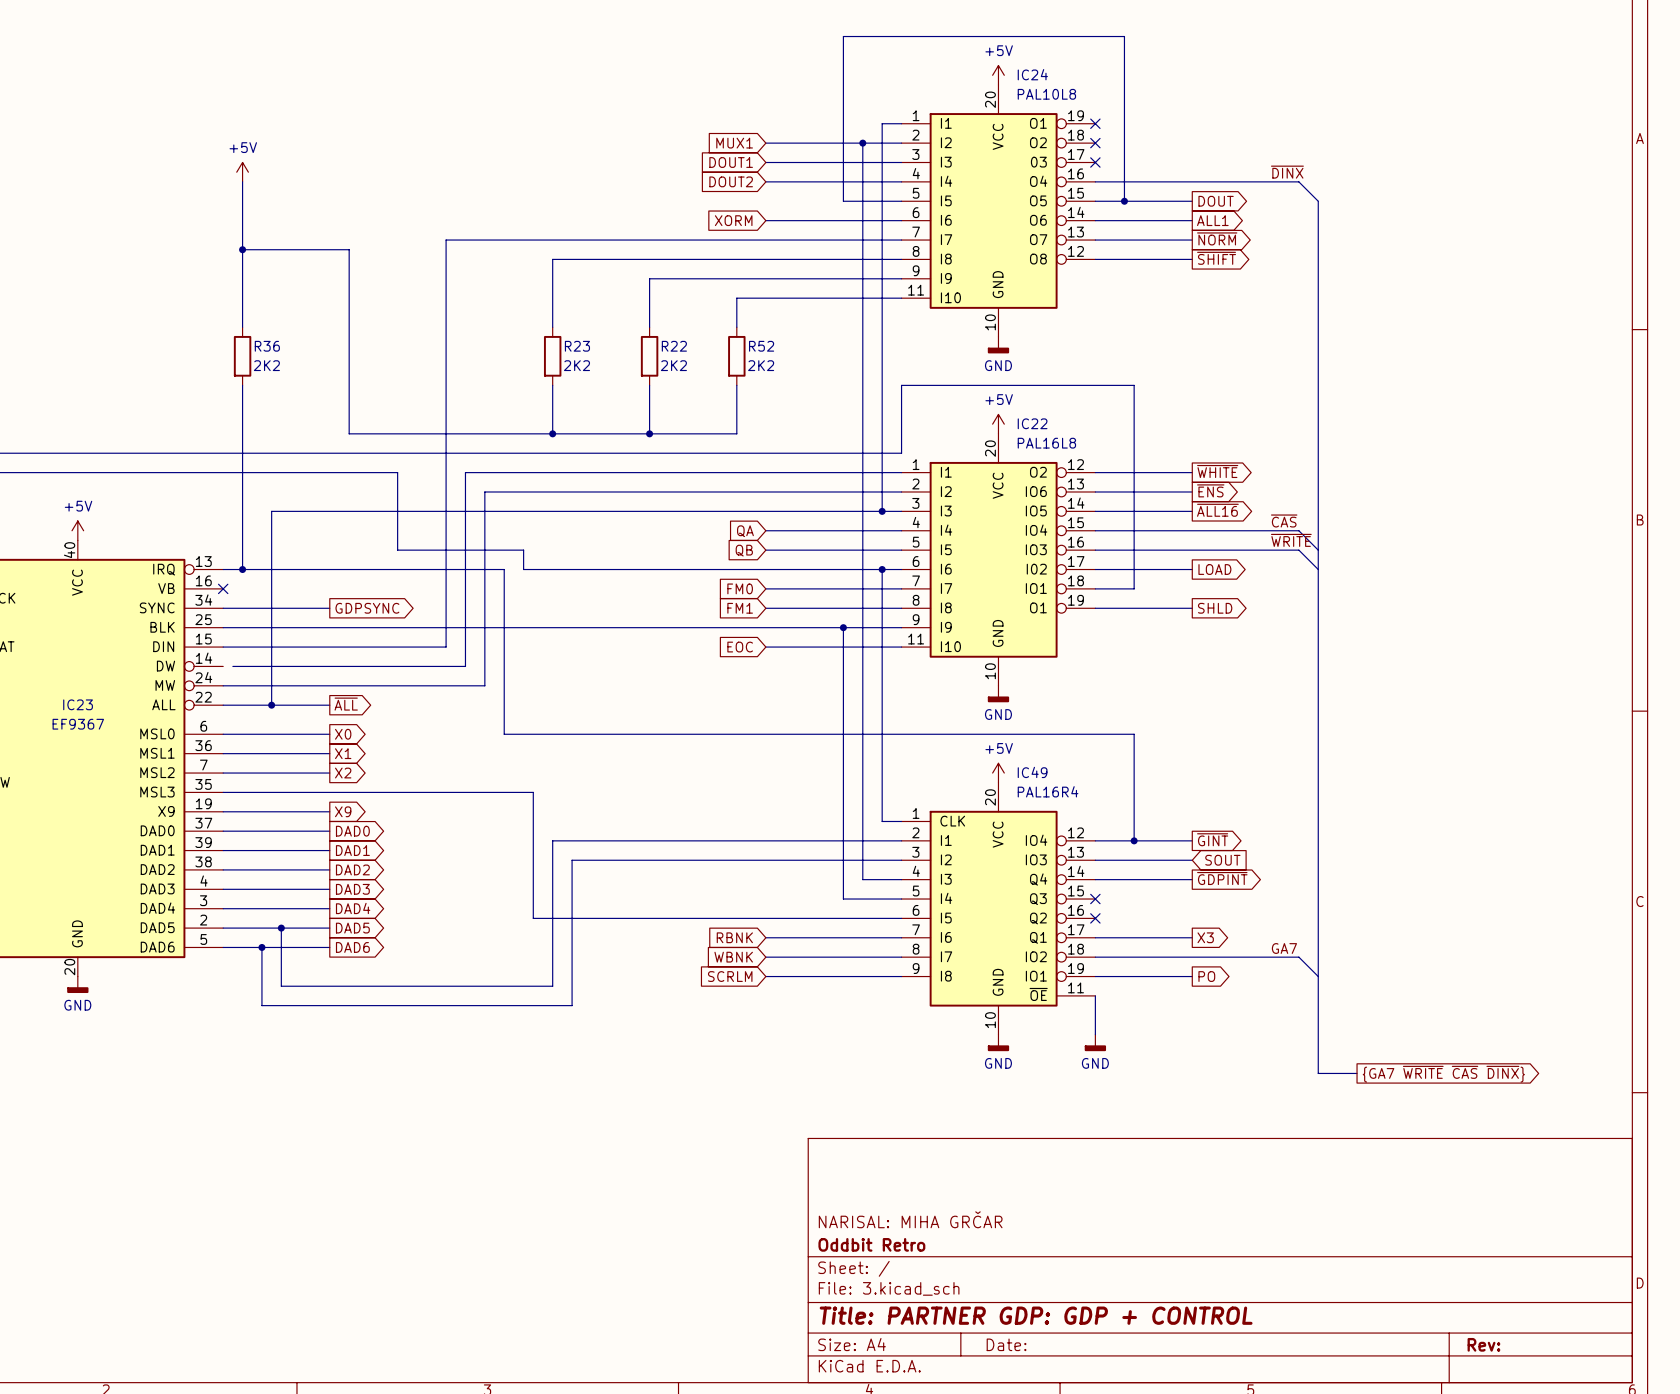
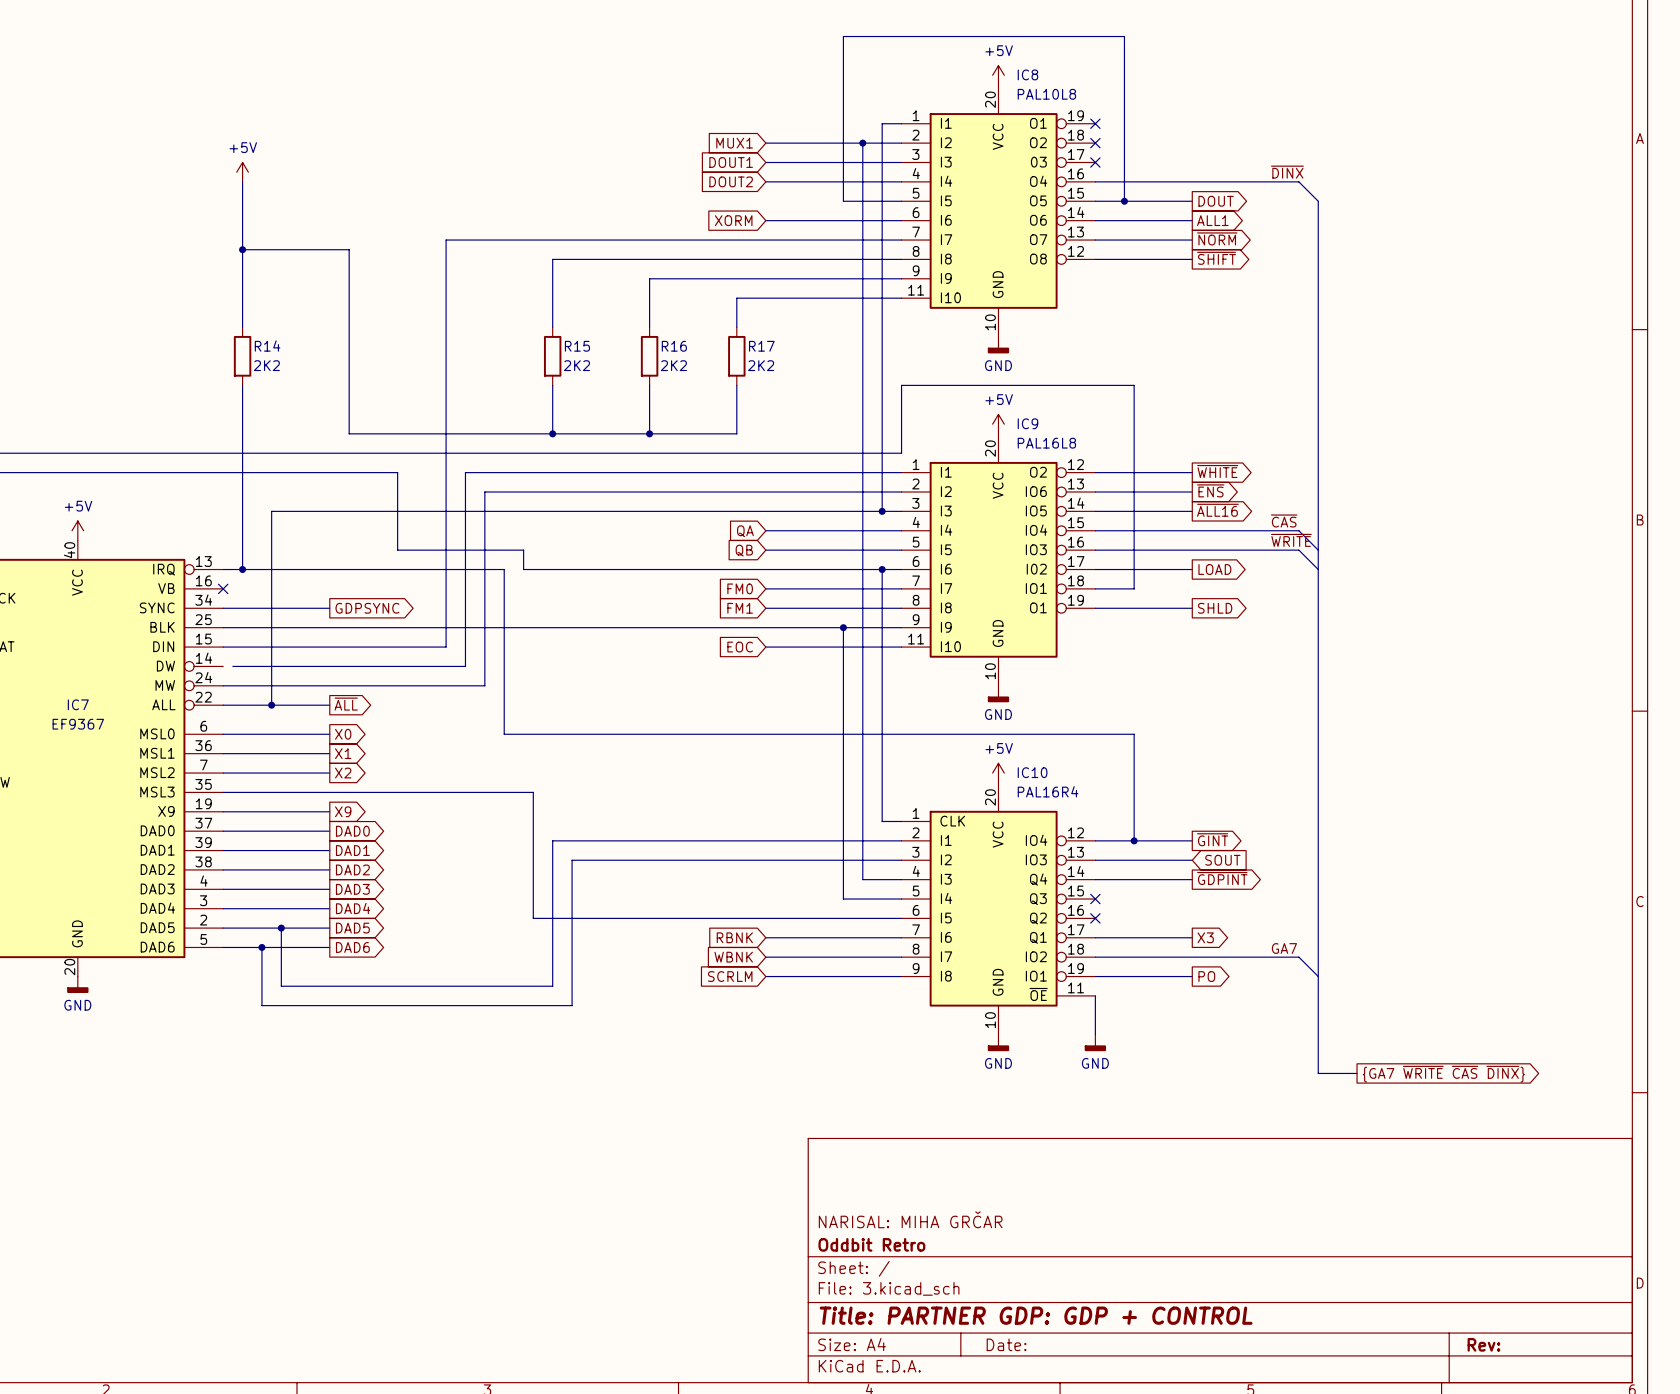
IC24 name: IC24 (1032, 74) -> IC8 (1027, 74)
R36 name: R36 (267, 346) -> R14 (267, 346)
R23 name: R23 (577, 346) -> R15 (577, 346)
R22 name: R22 (674, 346) -> R16 (674, 346)
R52 name: R52 (761, 346) -> R17 (761, 346)
IC22 name: IC22 (1032, 423) -> IC9 (1027, 423)
IC23 name: IC23 (78, 704) -> IC7 (78, 704)
IC49 name: IC49 (1032, 772) -> IC10 (1032, 772)

